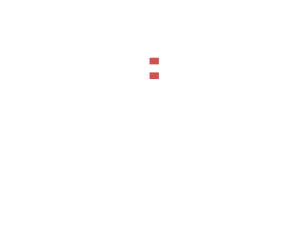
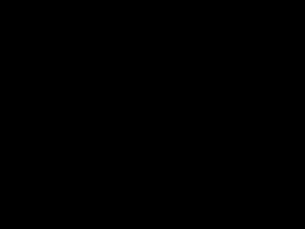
part: (154, 68) -> none

